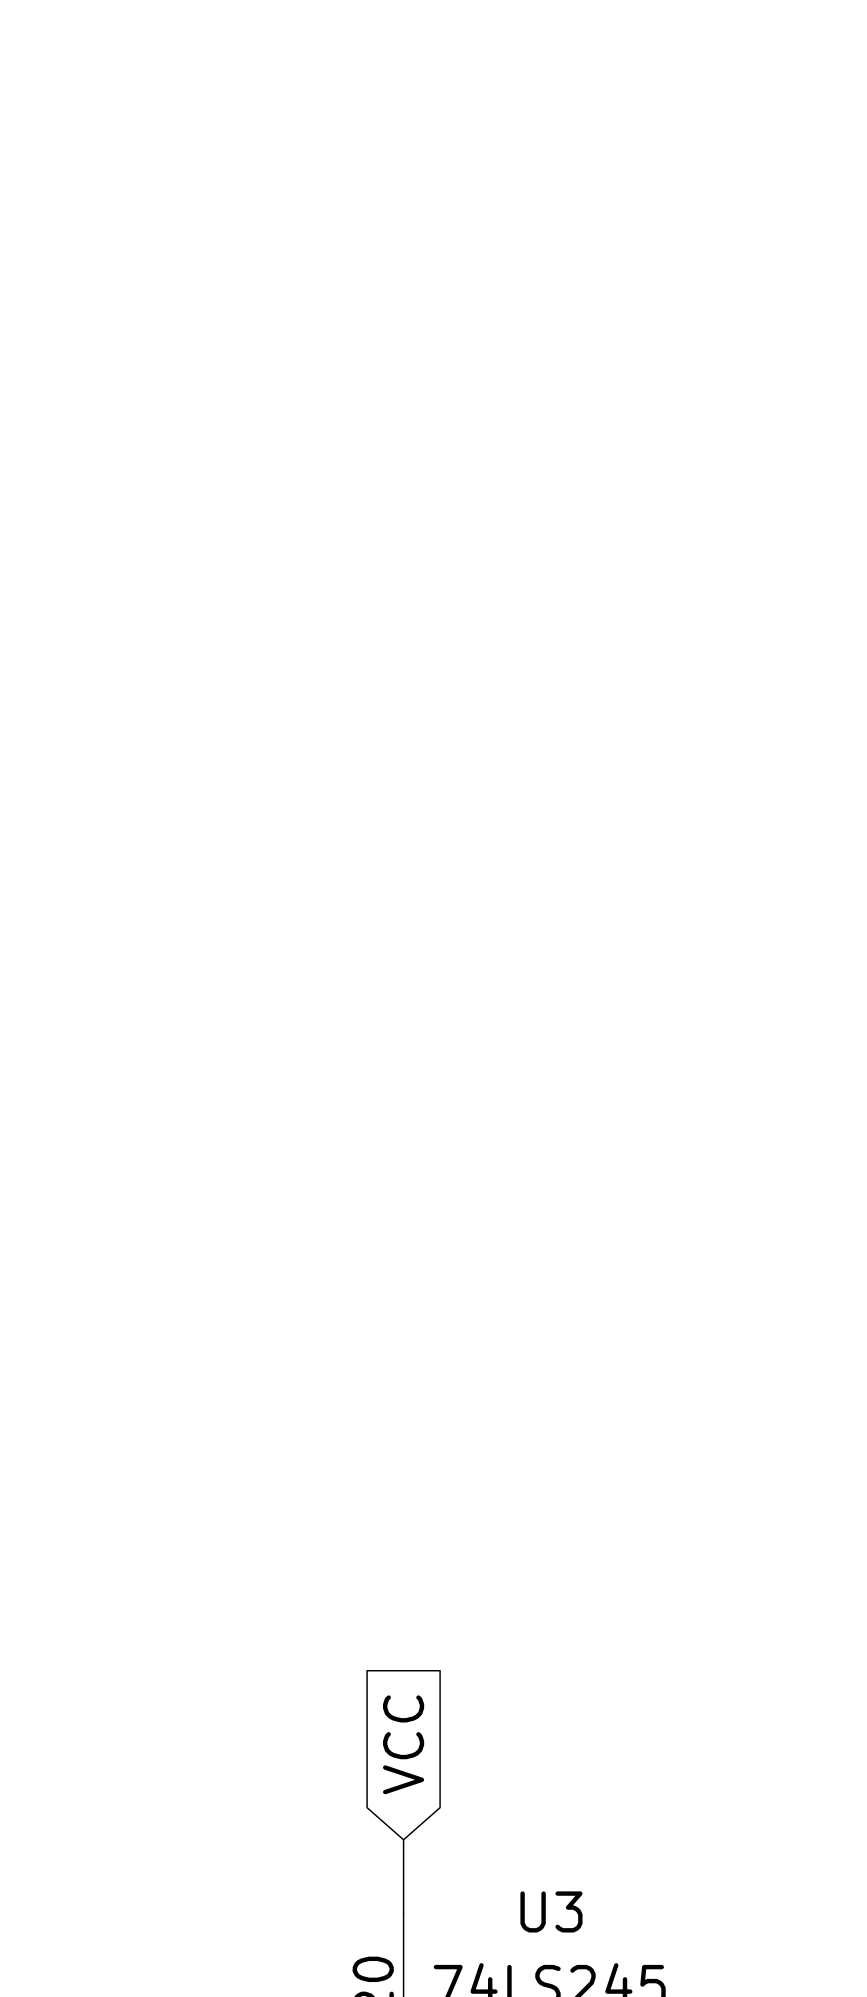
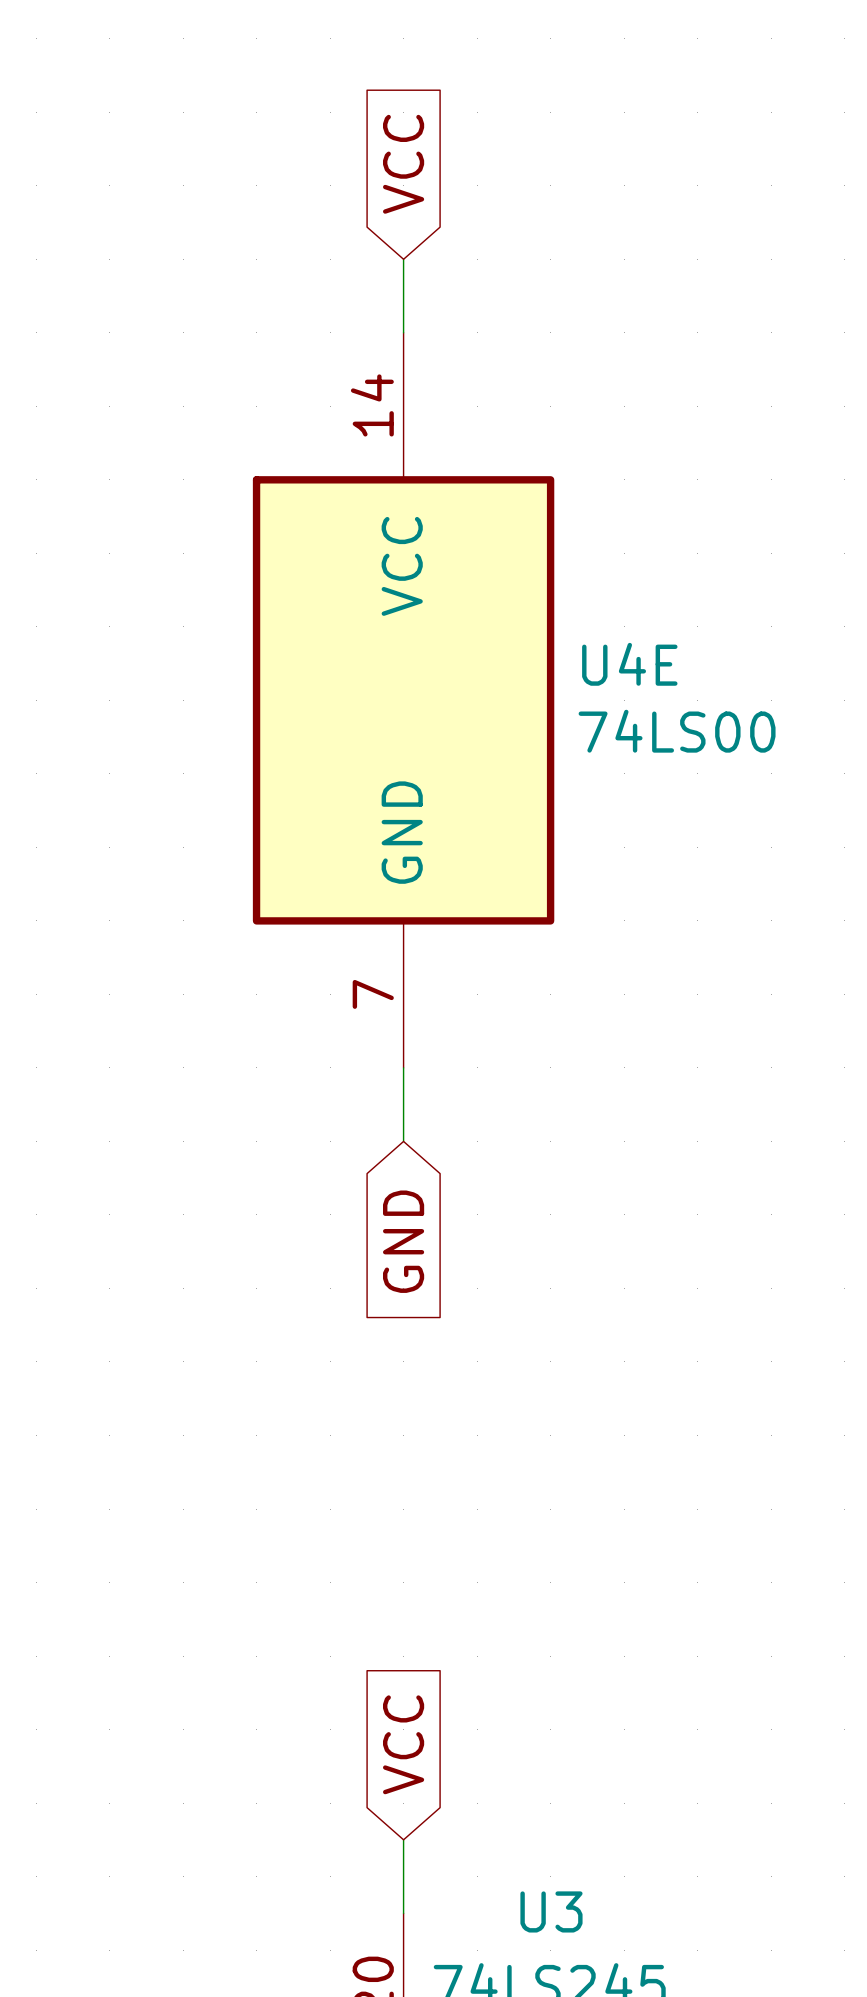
global label: none -> VCC (403, 164)
wire: none -> (403, 259) (403, 332)
U4E: none -> 74LS00 (403, 700)
wire: none -> (403, 1067) (403, 1141)
global label: none -> GND (403, 1241)

